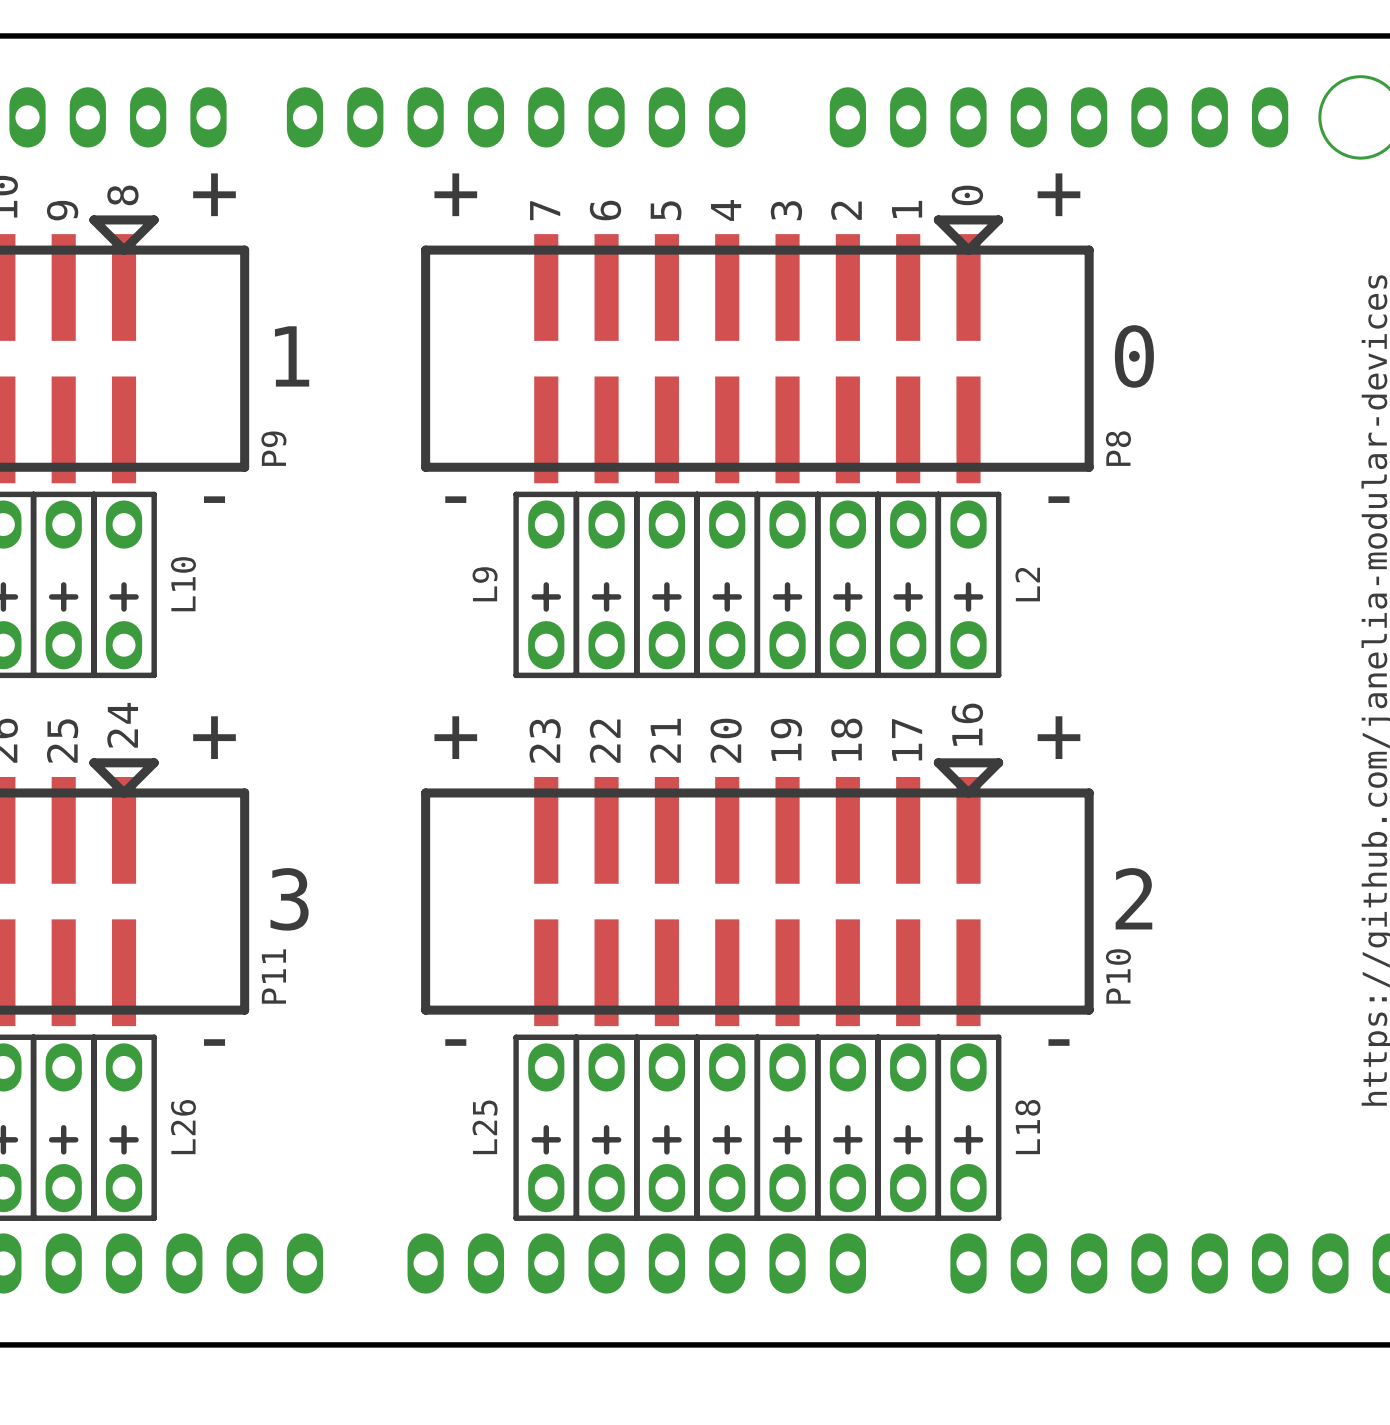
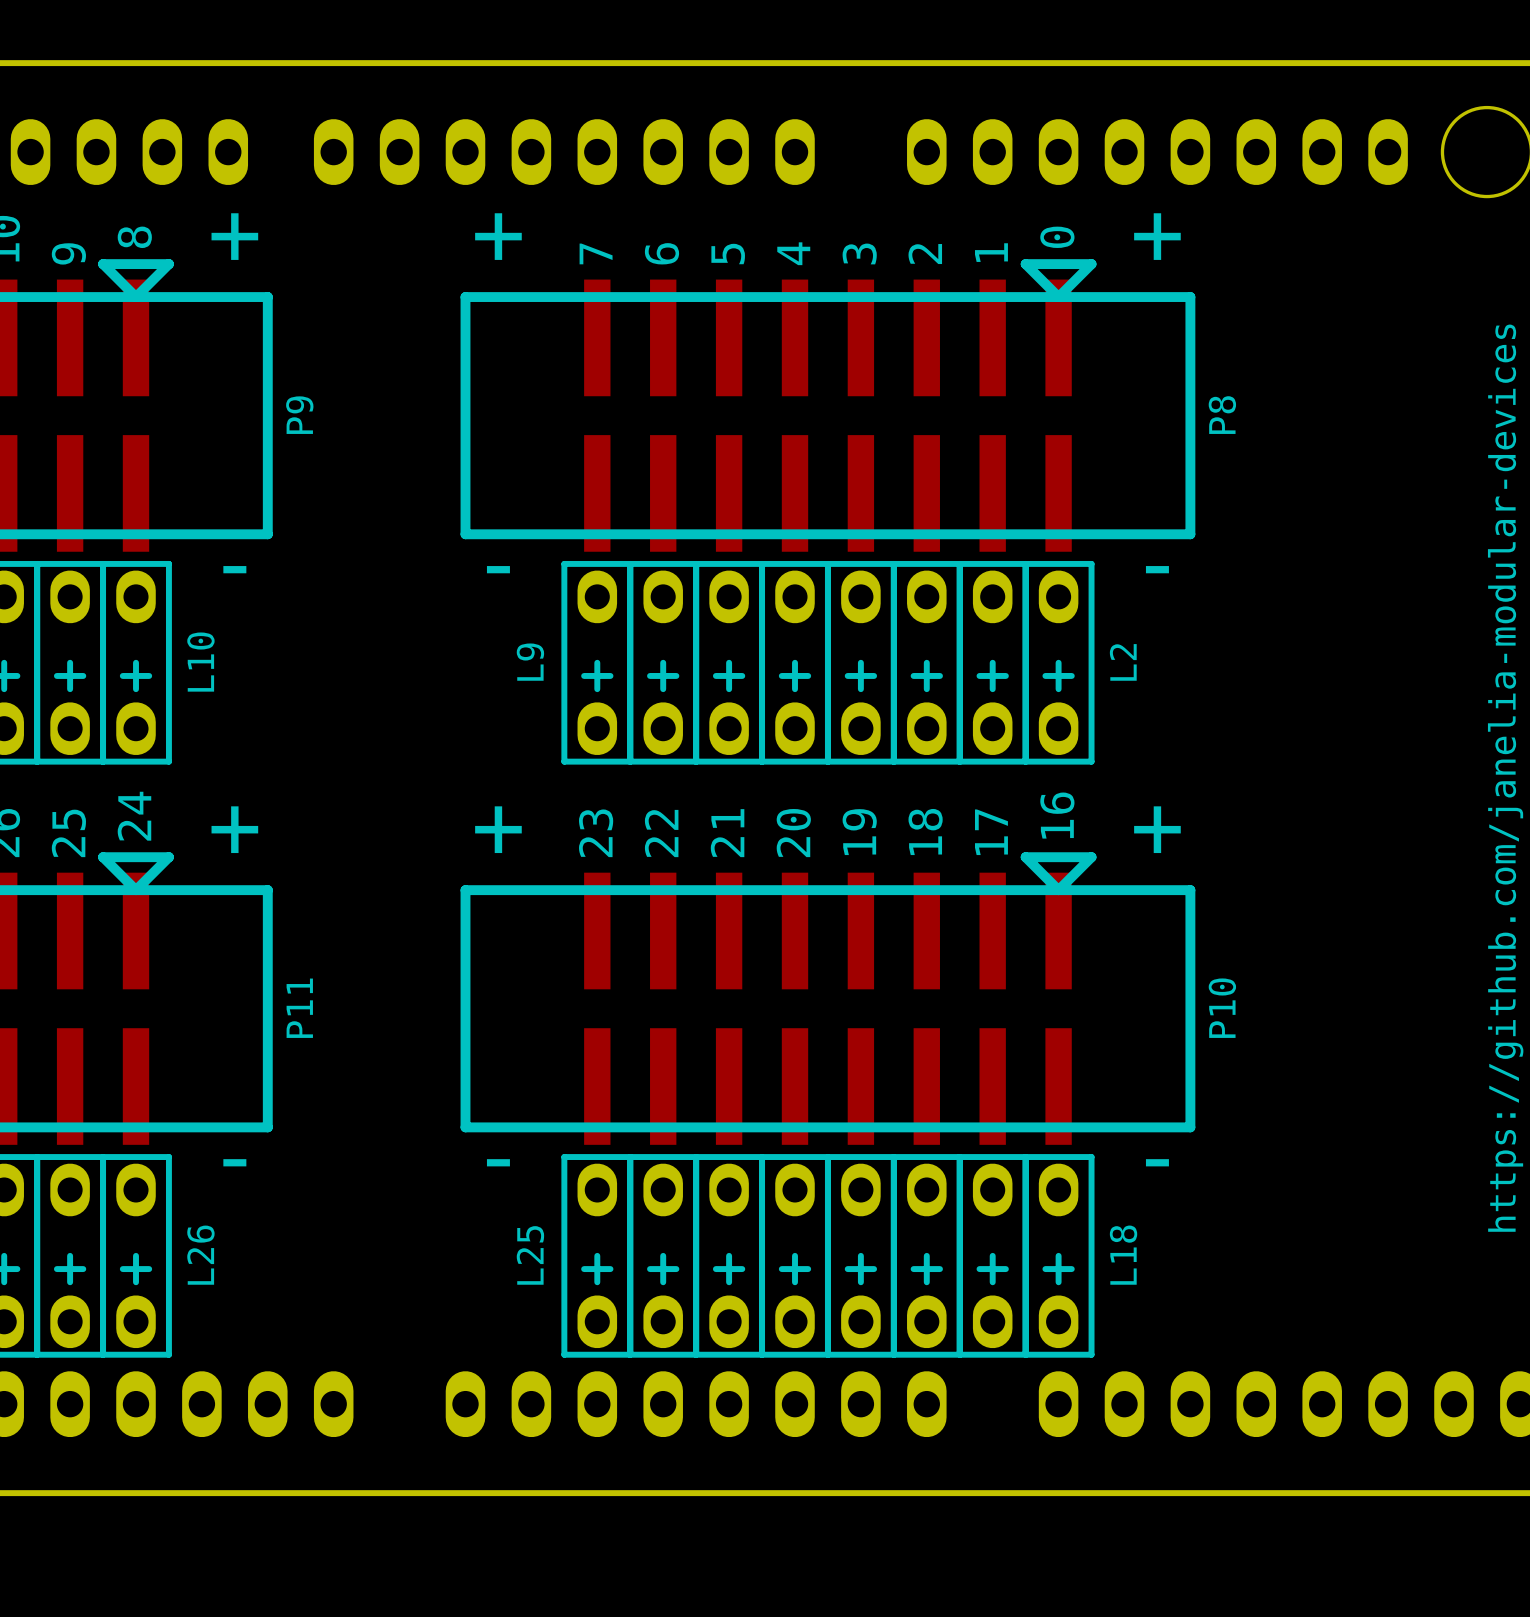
text: 1 (292, 356) -> none
text: 0 (1134, 356) -> none
P9 name position: P9 (273, 448) -> P9 (299, 415)
P8 name position: P8 (1118, 448) -> P8 (1222, 415)
text: 2 (1133, 898) -> none
text: 3 (289, 899) -> none
P11 name position: P11 (273, 976) -> P11 (299, 1008)
P10 name position: P10 (1118, 976) -> P10 (1222, 1008)

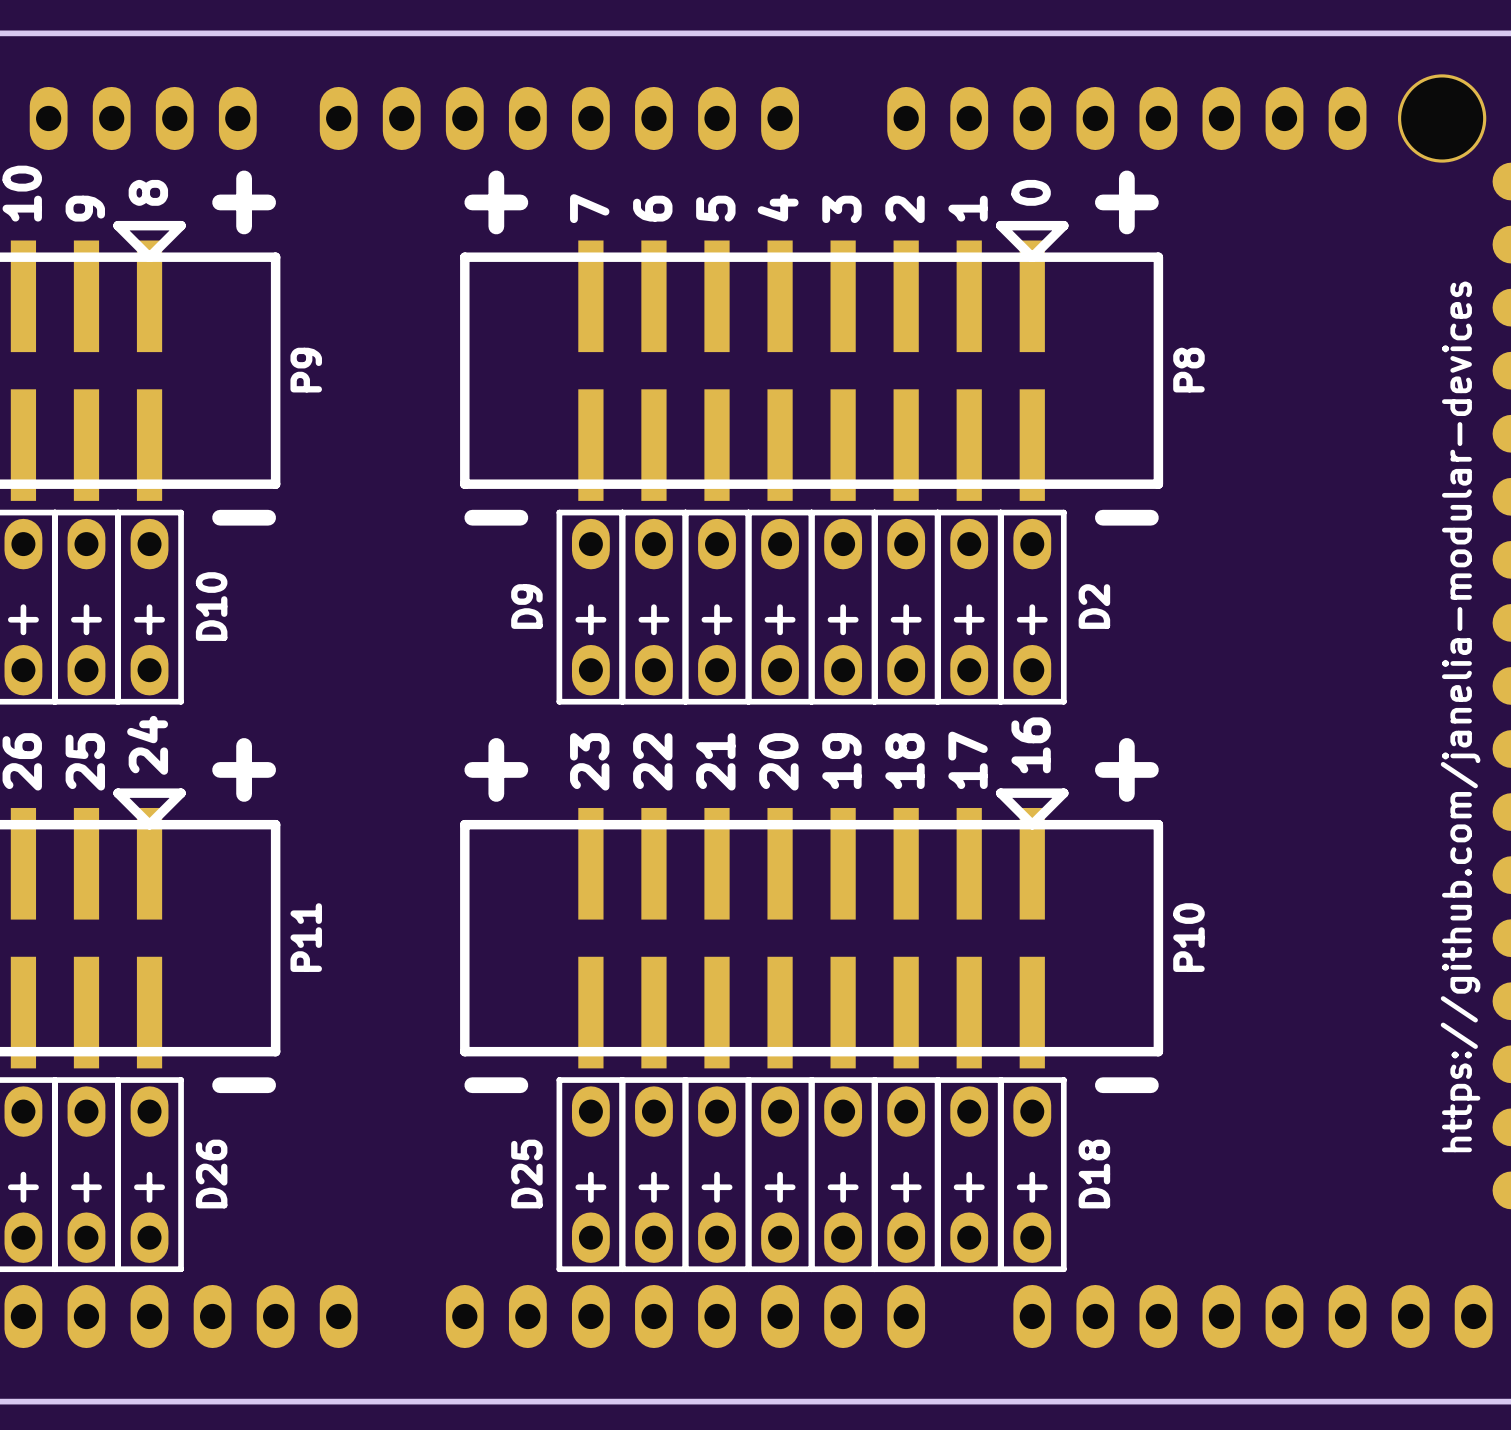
L10 name: L10 (200, 662) -> D10 (211, 606)
L9 name: L9 (530, 662) -> D9 (526, 606)
L2 name: L2 (1123, 662) -> D2 (1094, 606)
L26 name: L26 (200, 1255) -> D26 (211, 1174)
L25 name: L25 (530, 1255) -> D25 (526, 1174)
L18 name: L18 (1123, 1255) -> D18 (1094, 1174)

